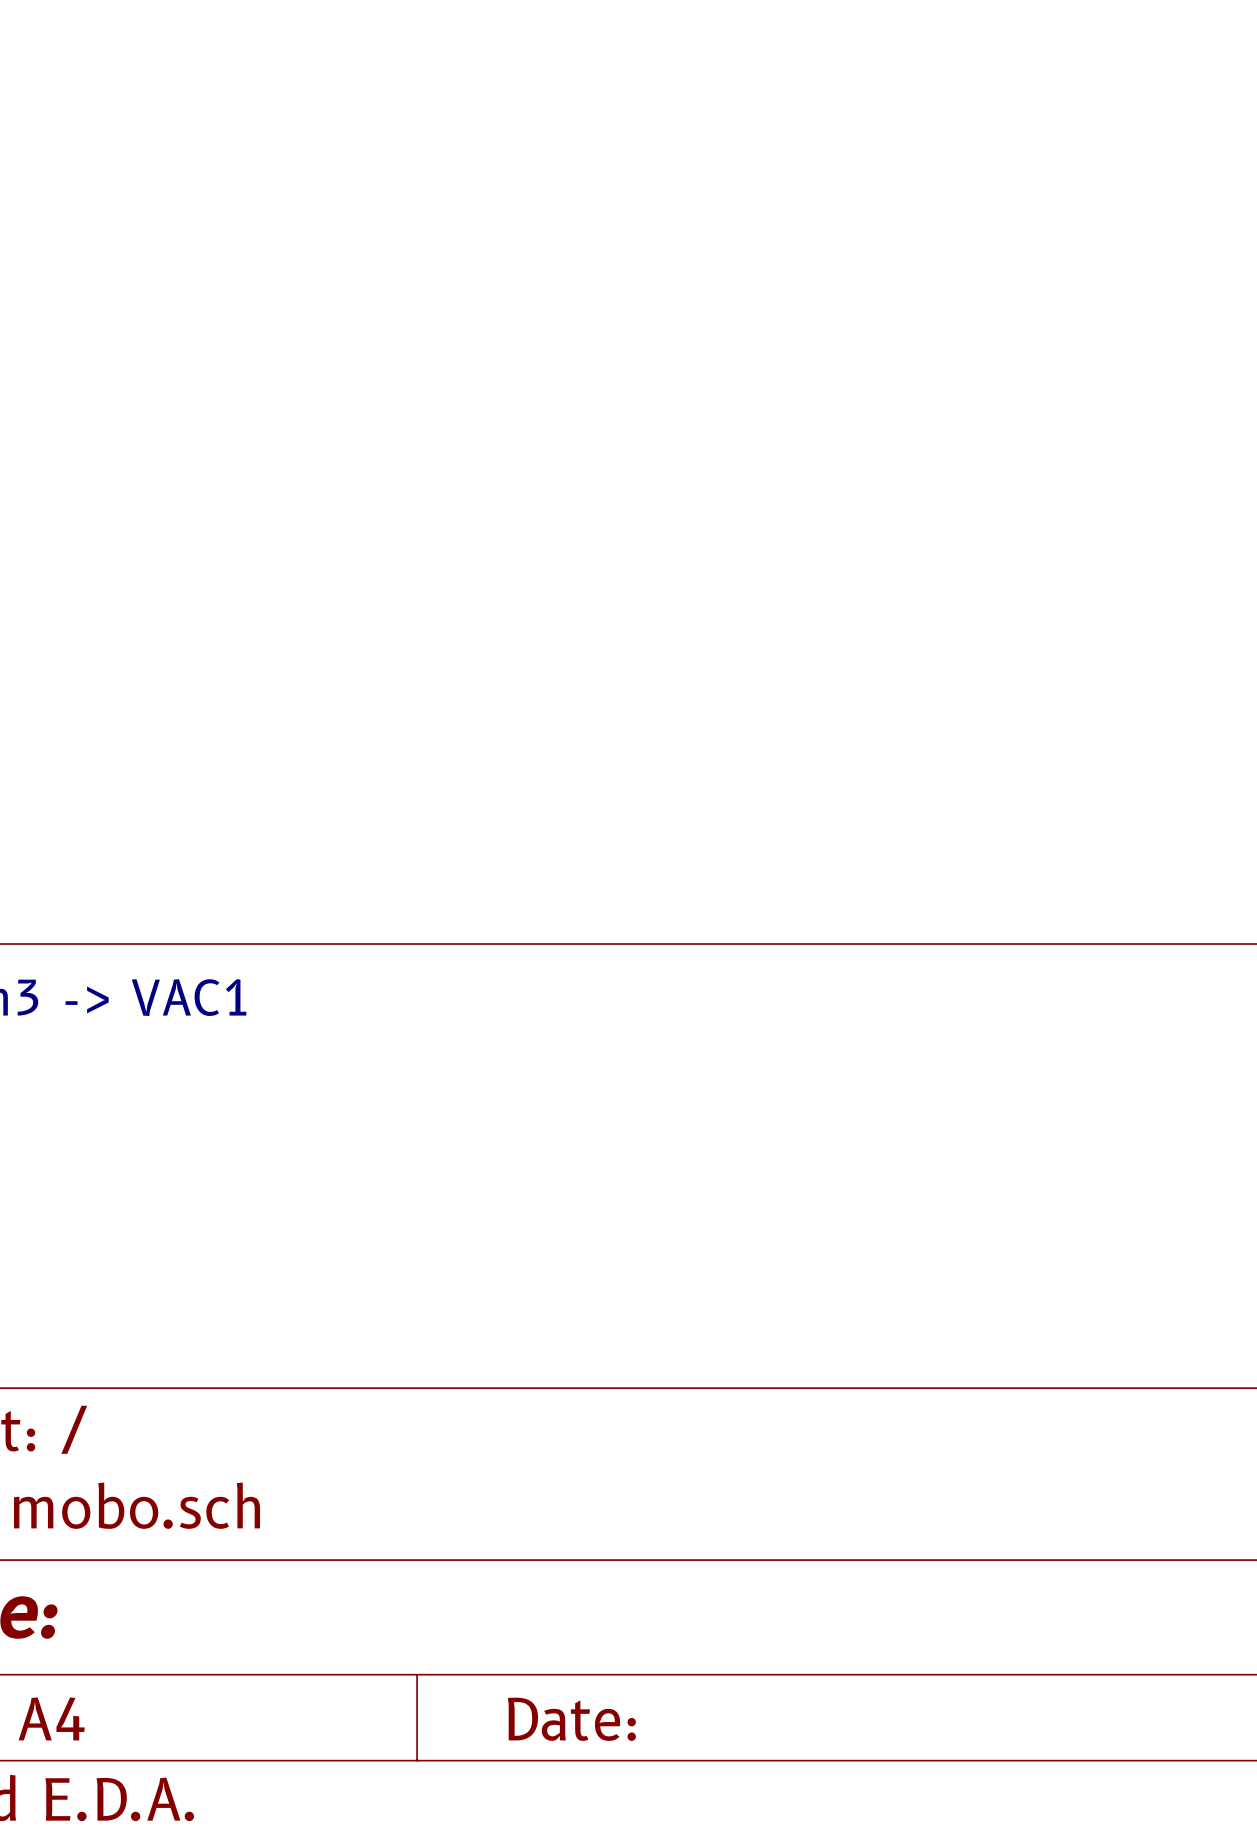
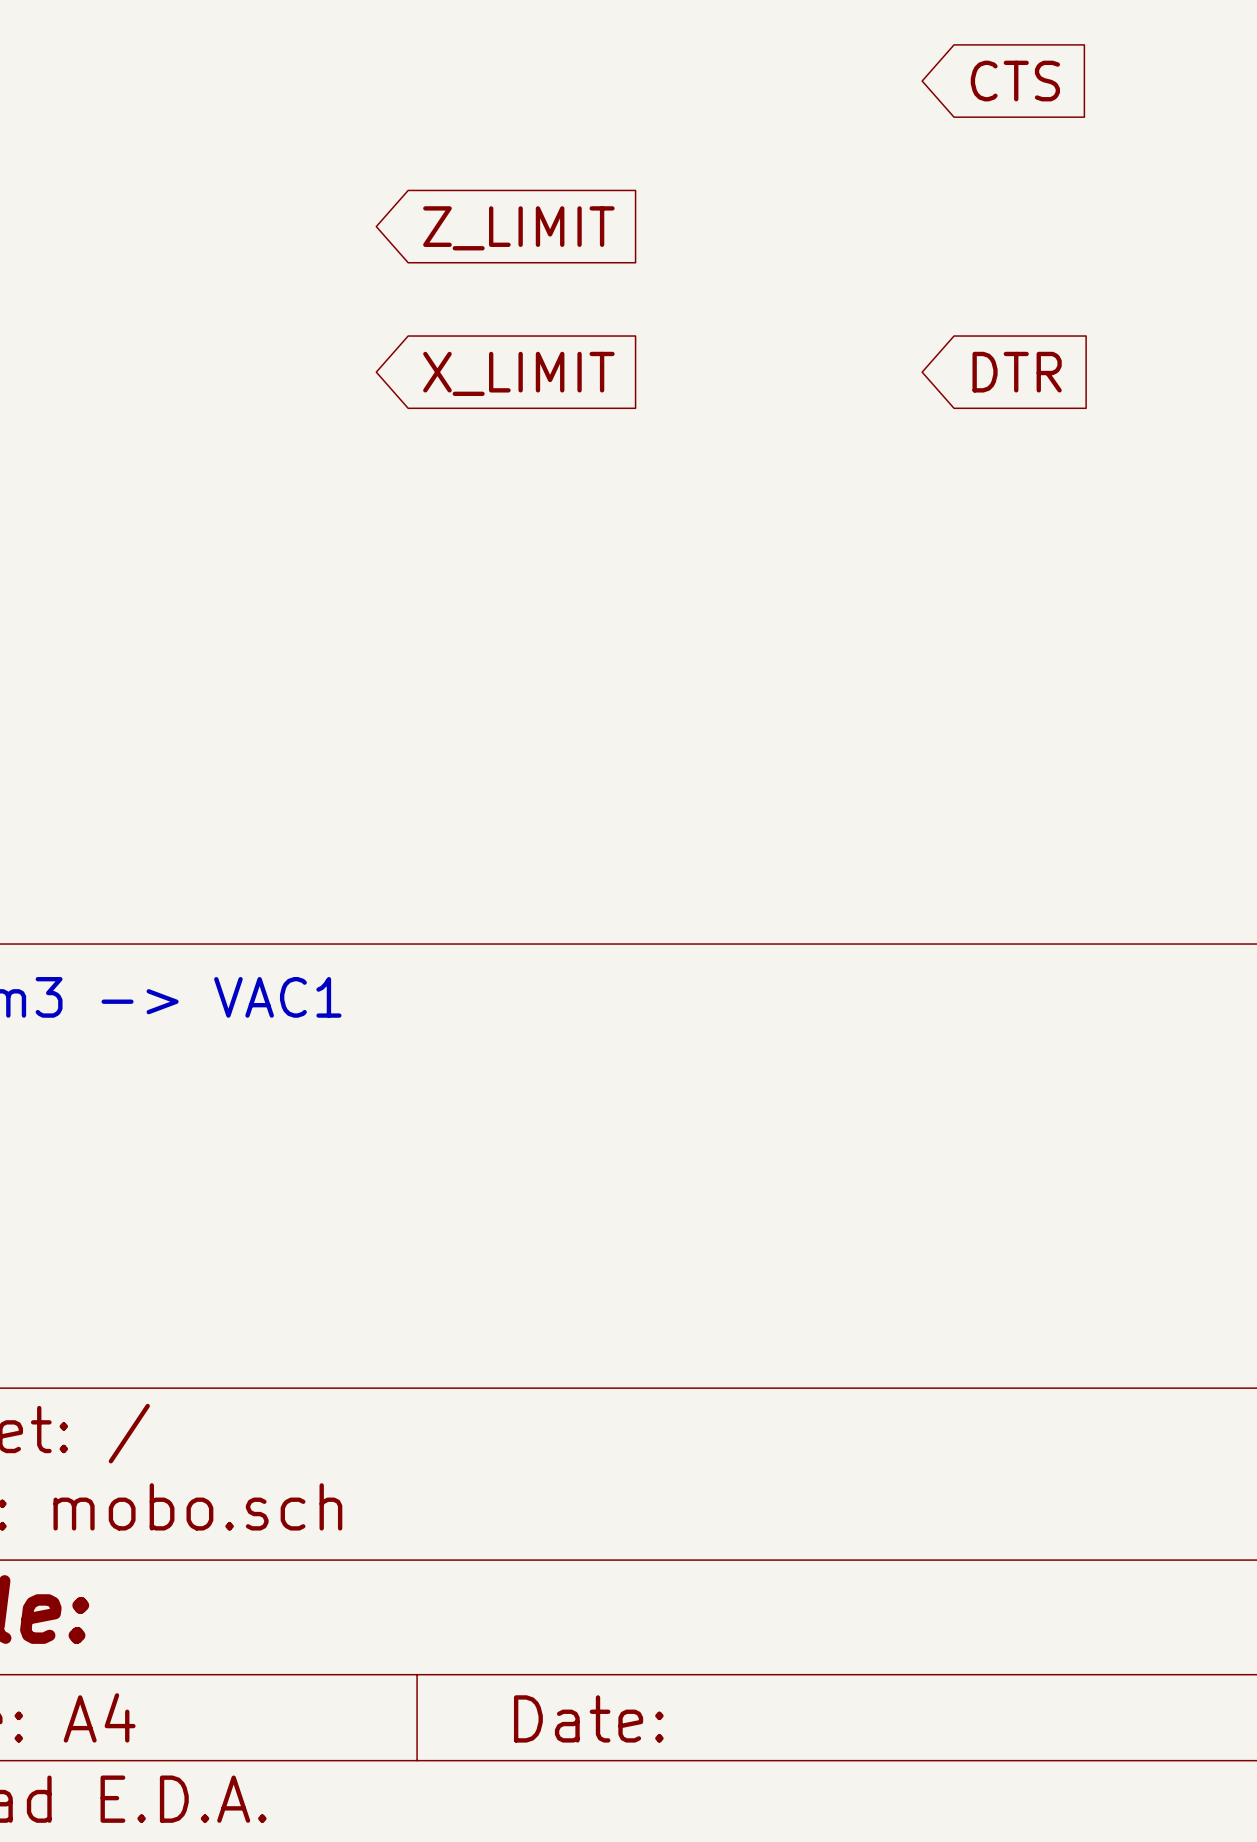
global label: none -> CTS (1015, 81)
global label: none -> Z_LIMIT (518, 228)
global label: none -> DTR (1017, 372)
global label: none -> X_LIMIT (518, 373)

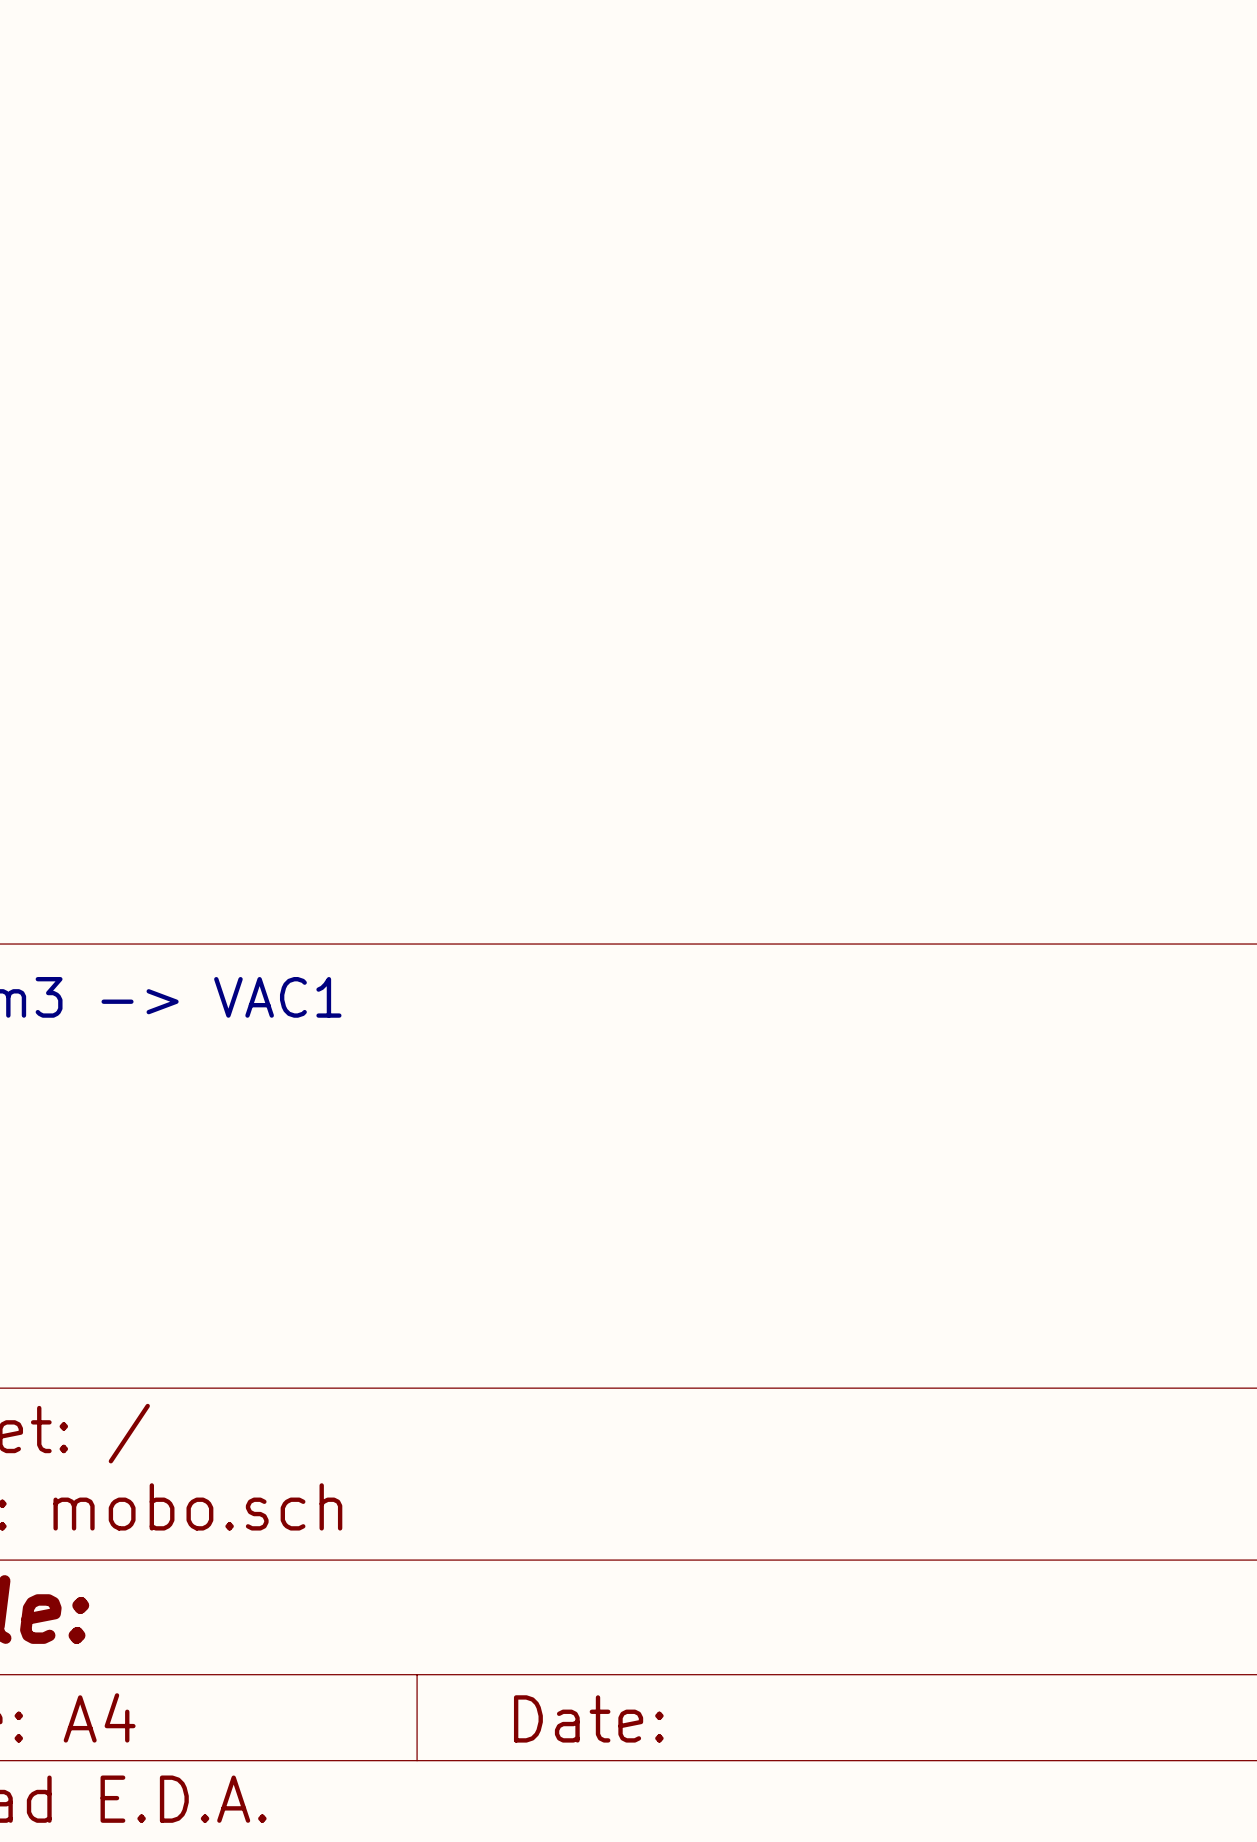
global label: CTS (1015, 81) -> none
global label: Z_LIMIT (518, 228) -> none
global label: DTR (1017, 372) -> none
global label: X_LIMIT (518, 373) -> none

